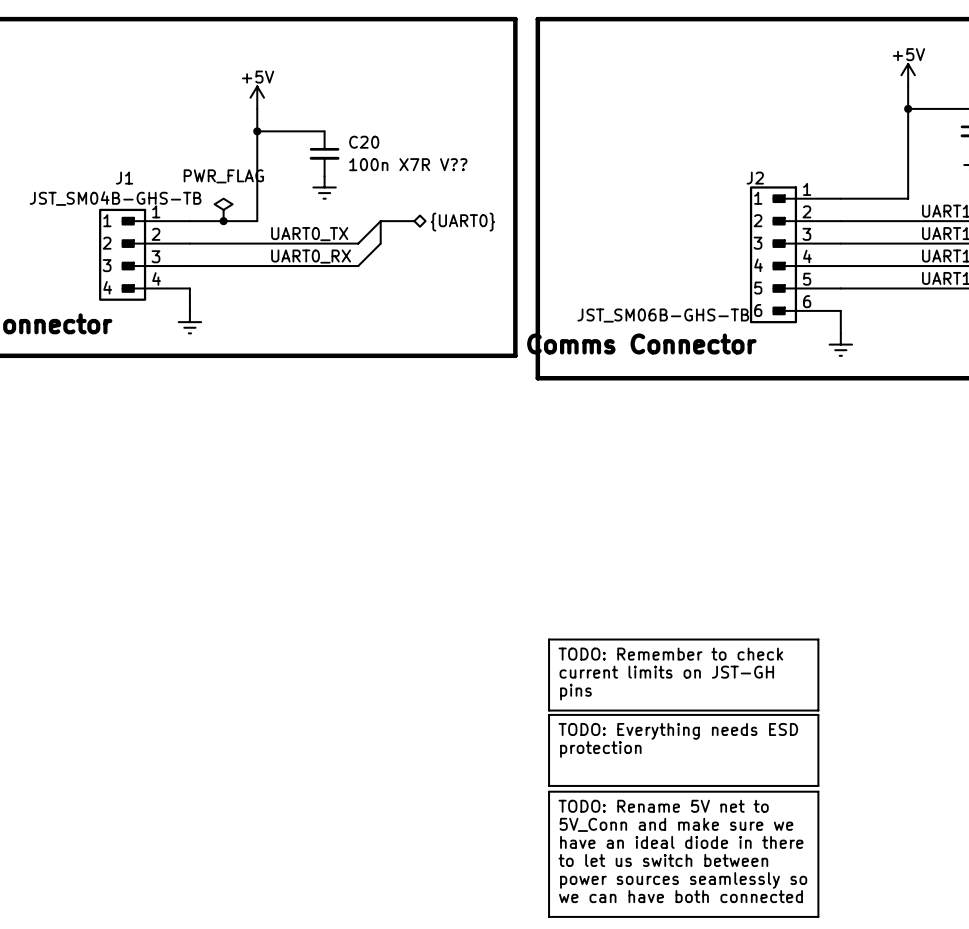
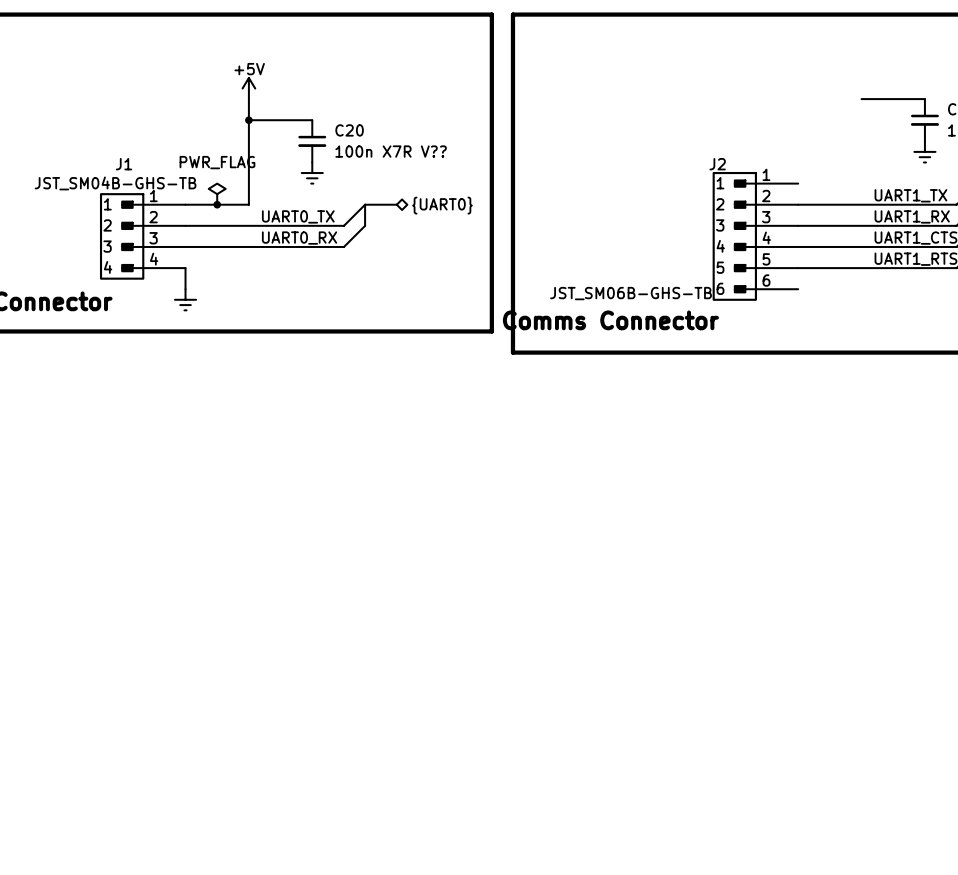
power symbol: +5V (908, 75) -> none
wire: (908, 86) (908, 198) (840, 198) -> none
junction: (908, 108) -> none
wire: (840, 310) (840, 333) -> none
power symbol: (840, 344) -> none
line: (549, 639) (549, 710) (818, 710) (818, 639) (549, 639) -> none
text: TODO: Remember to check (670, 654) -> none
text: current limits on JST-GH (666, 672) -> none
text: pins (575, 692) -> none
line: (549, 714) (549, 785) (818, 785) (818, 714) (549, 714) -> none
text: TODO: Everything needs ESD (678, 731) -> none
text: protection (600, 749) -> none
line: (549, 791) (818, 791) (818, 916) (549, 916) (549, 791) -> none
text: TODO: Rename 5V net to (663, 806) -> none
text: 5V_Conn and make sure we (676, 824) -> none
text: have an ideal diode in there (681, 842) -> none
text: to let us switch between (663, 860) -> none
text: power sources seamlessly so (683, 880) -> none
text: we can have both connected (680, 896) -> none

